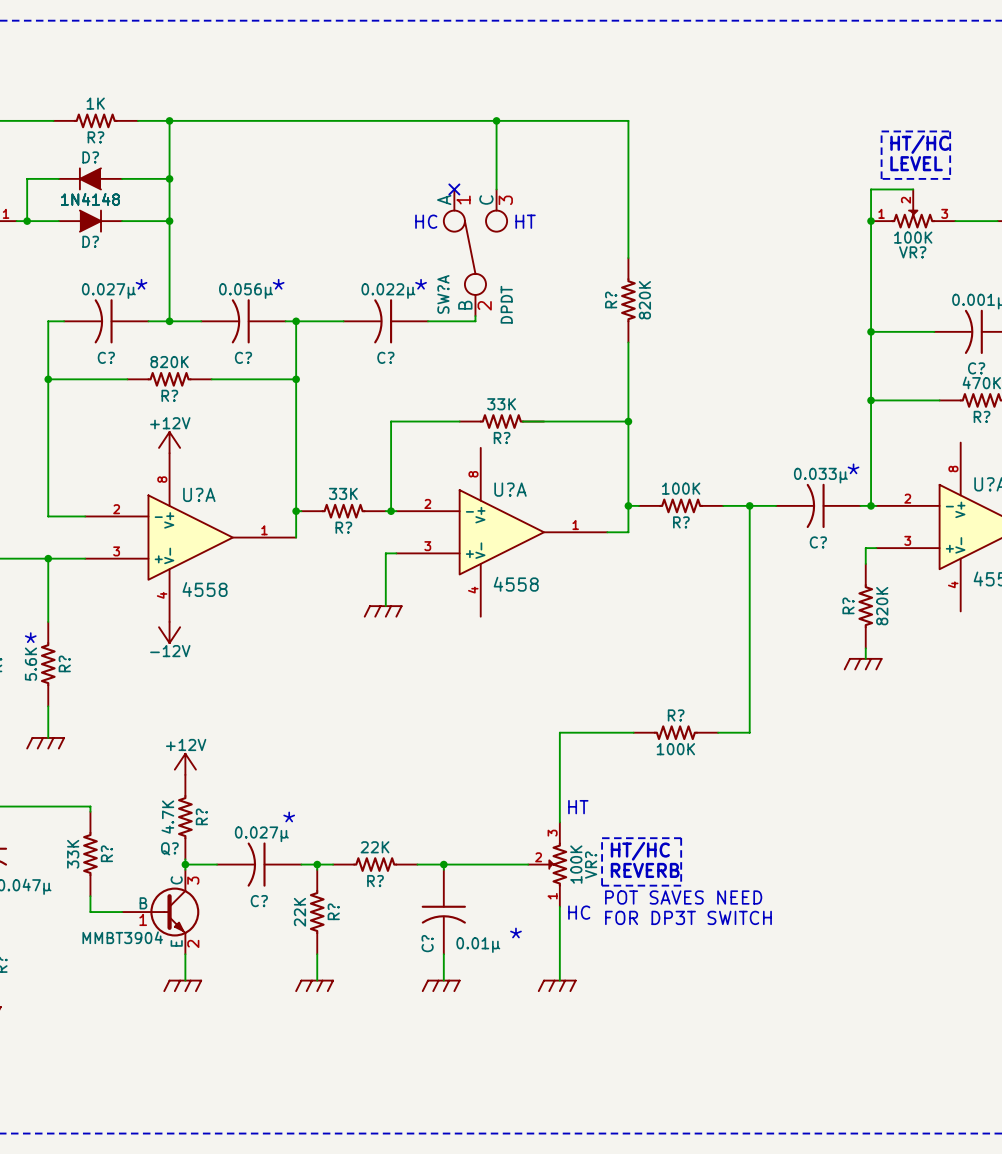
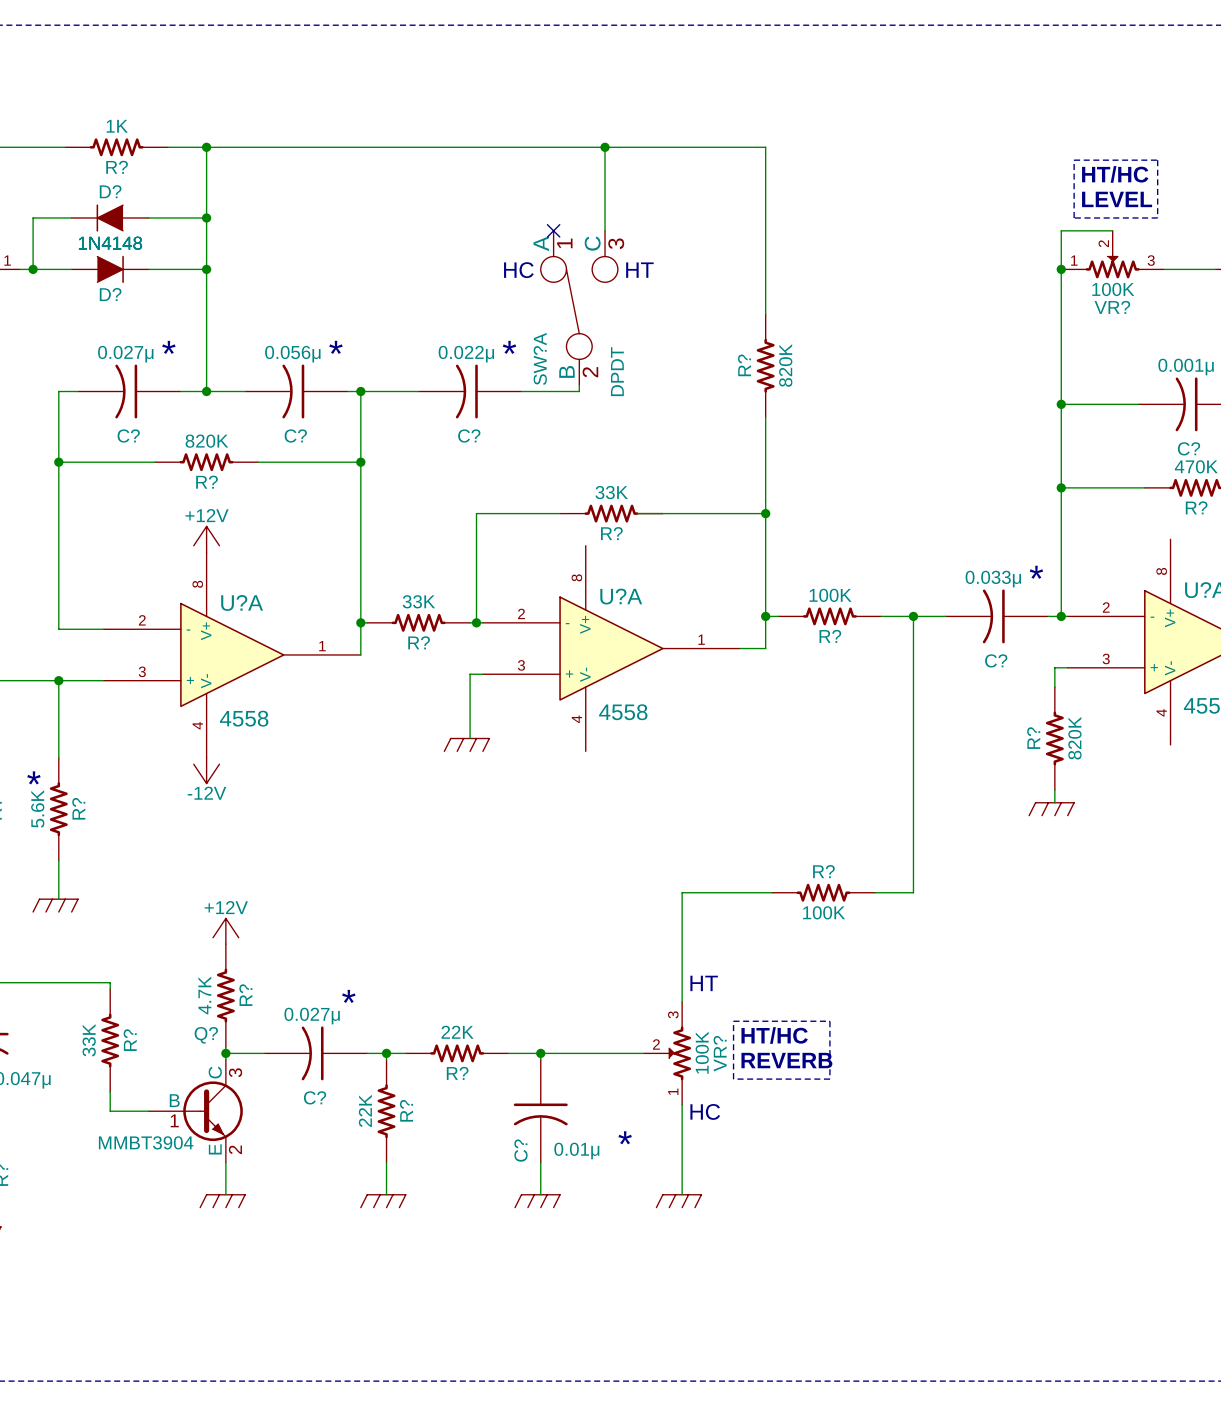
text: POT SAVES NEED (683, 897) -> none
text: FOR DP3T SWITCH (688, 917) -> none

